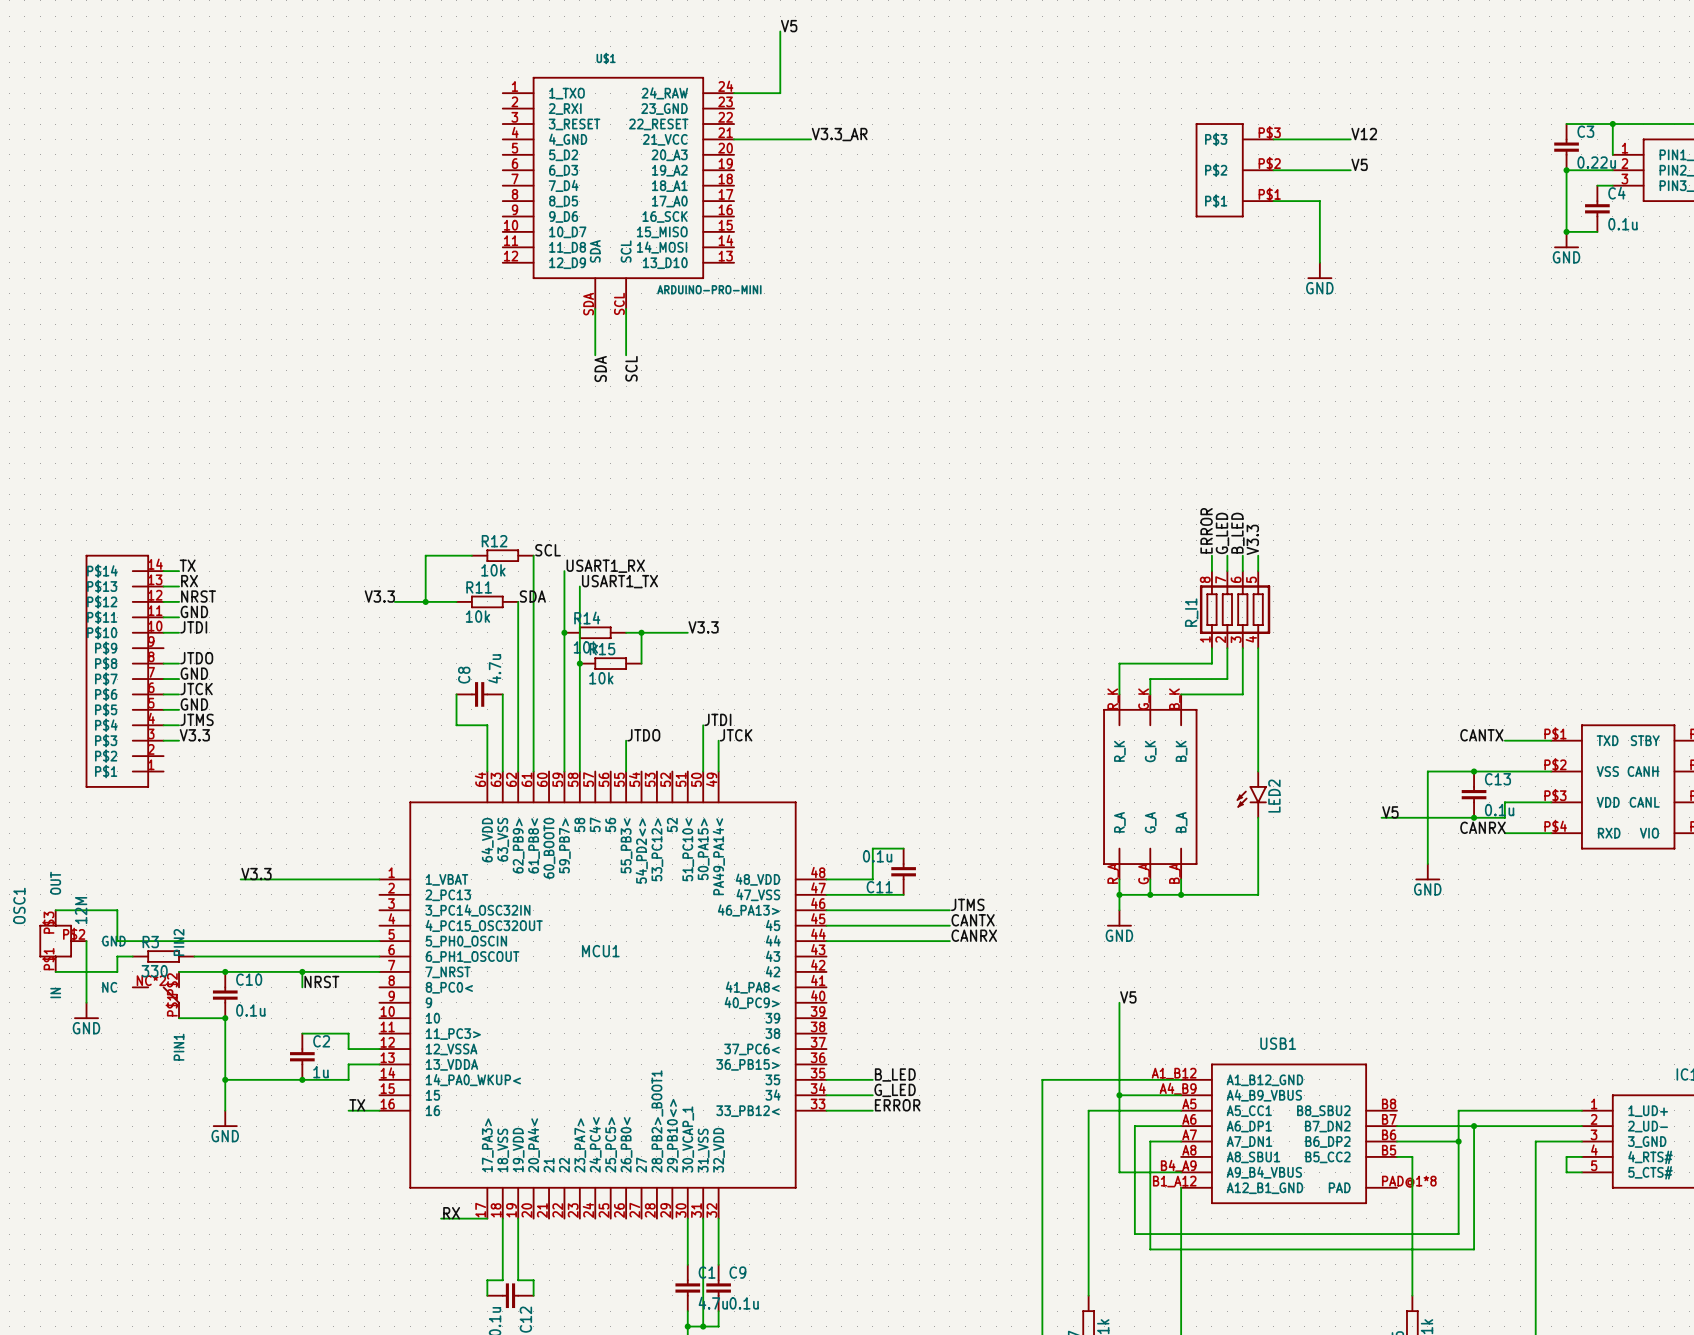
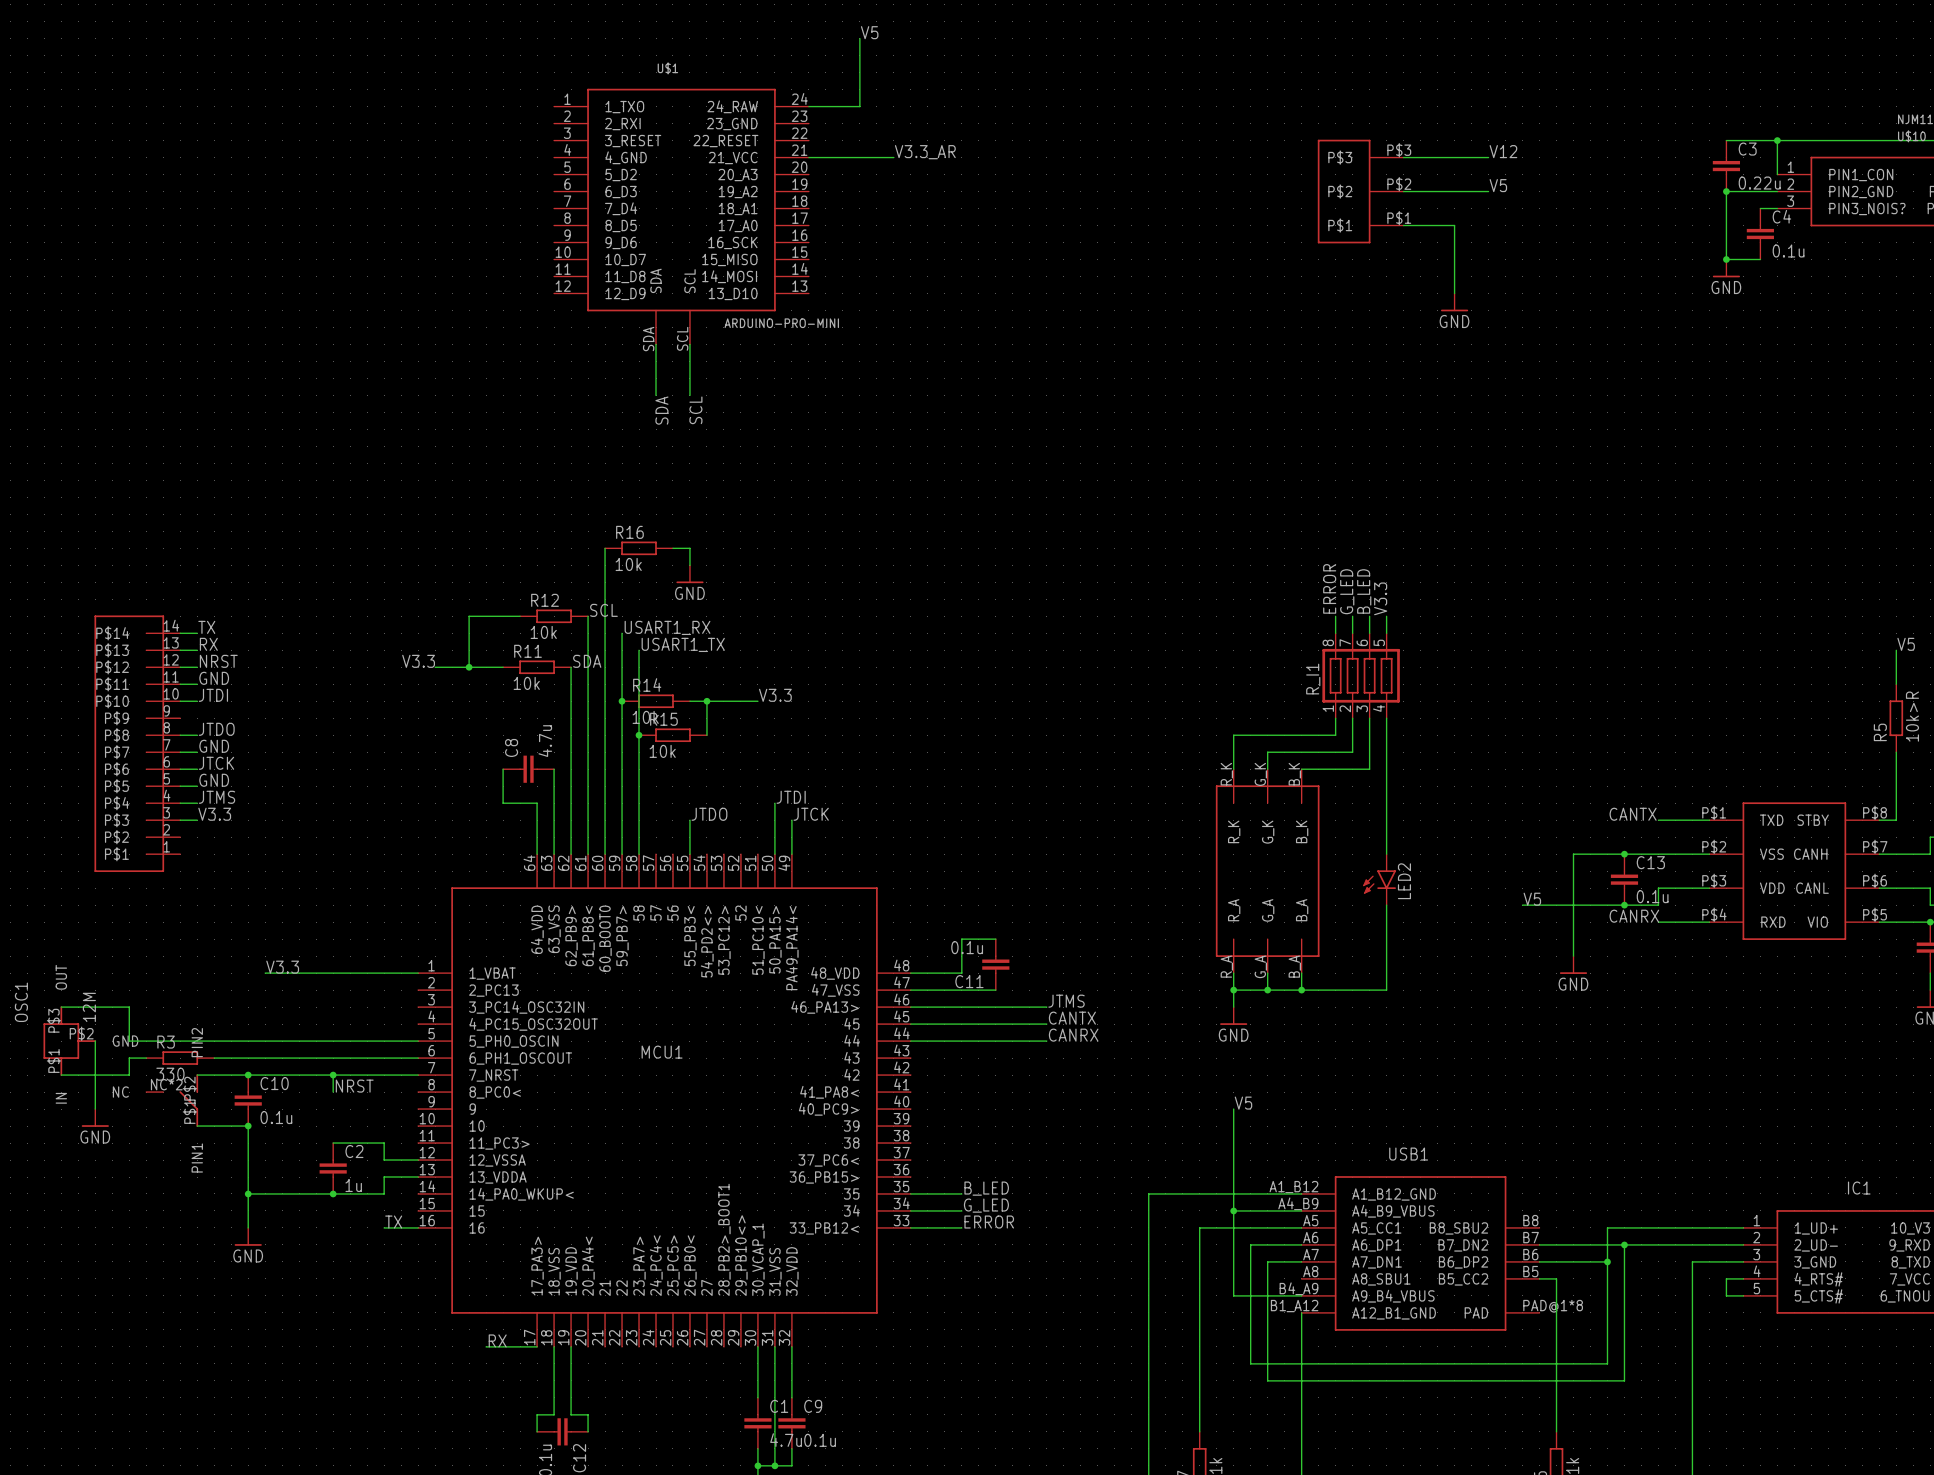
wire: none -> (605, 548) (605, 854)
R16: none -> 10k (639, 548)
wire: none -> (672, 548) (689, 548) (689, 565)
power symbol: none -> GND (689, 574)

